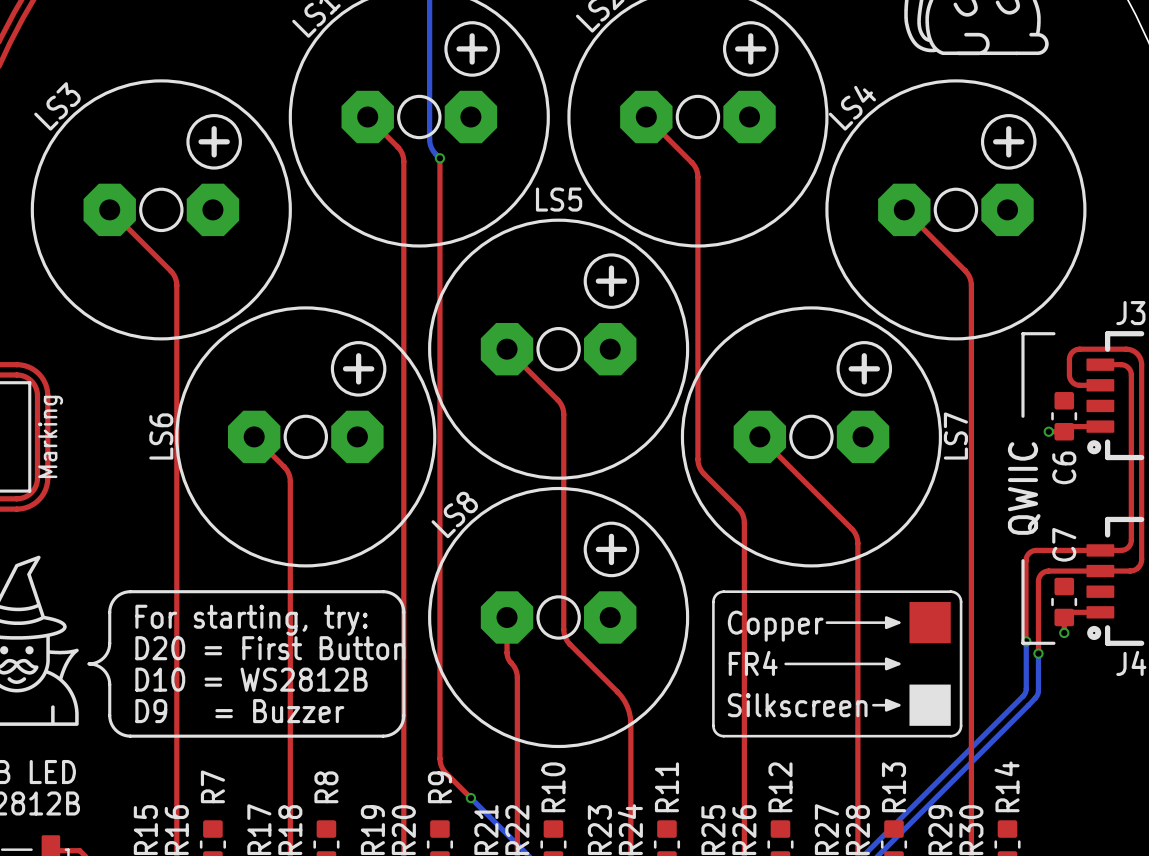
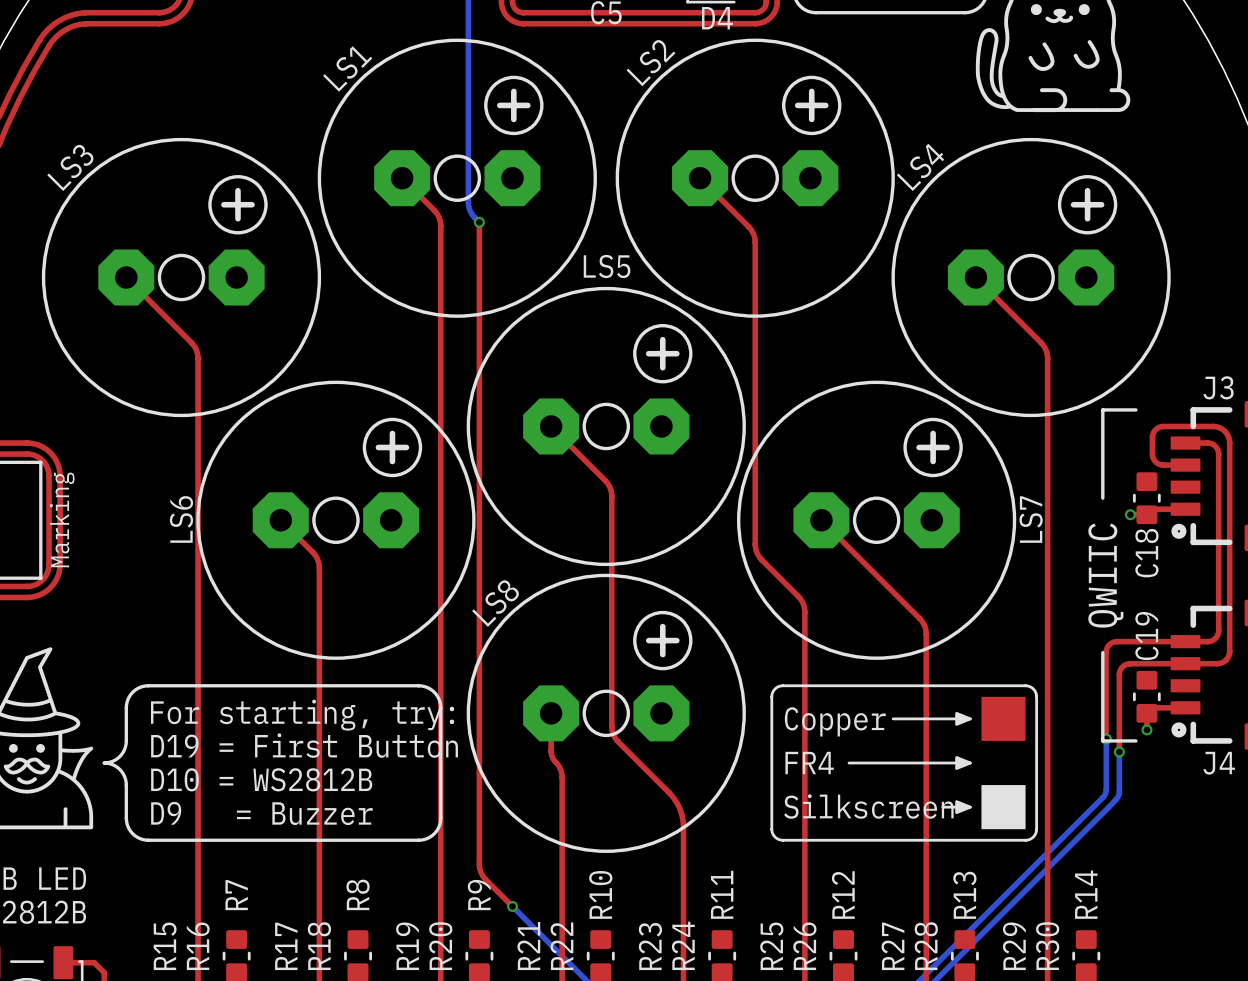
C6 name: C6 (1064, 467) -> C18 (1146, 553)
C7 name: C7 (1064, 544) -> C19 (1146, 636)
text: D20 = First Button (270, 648) -> D19 = First Button (304, 745)

